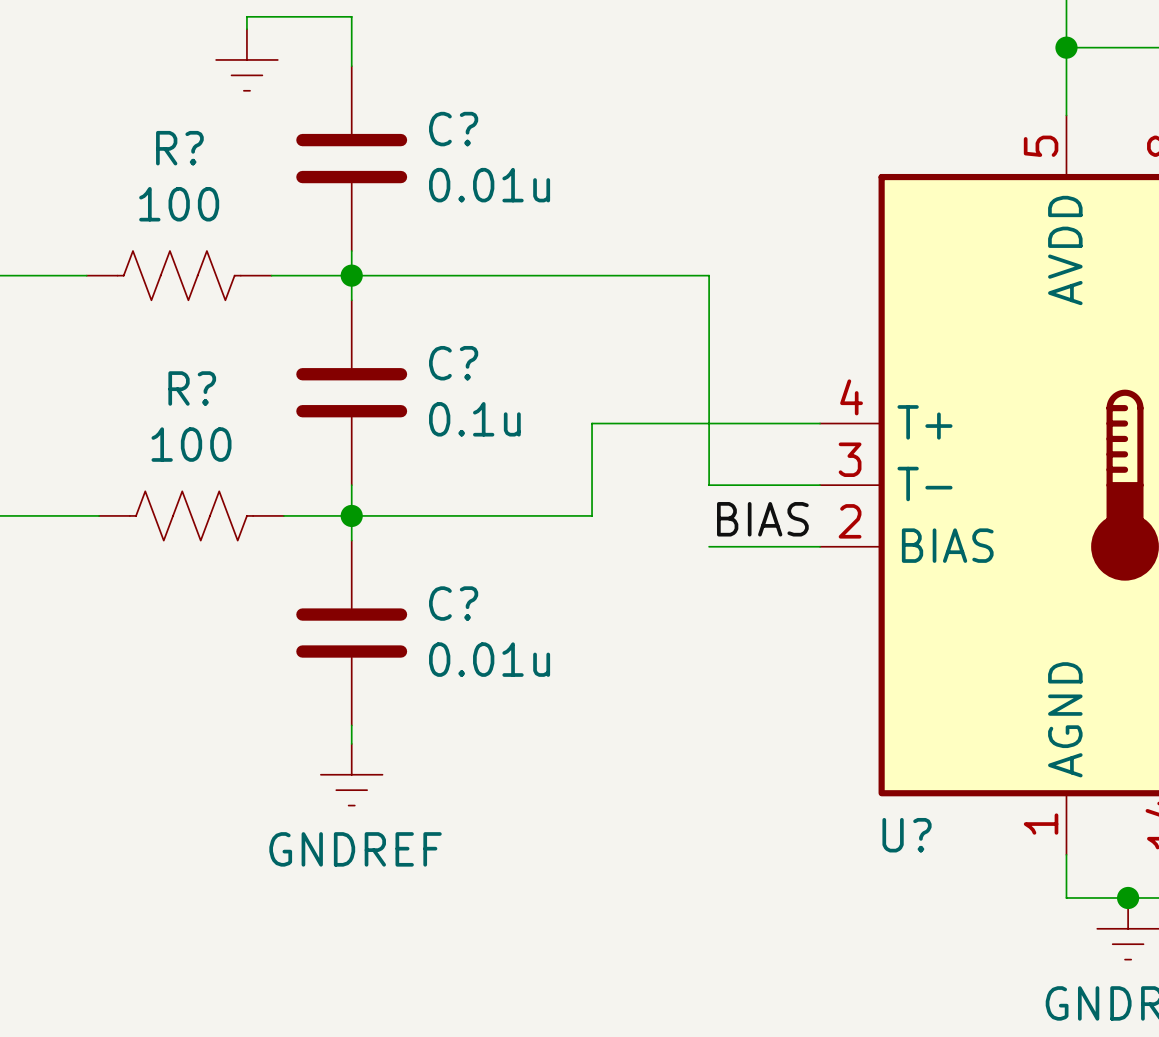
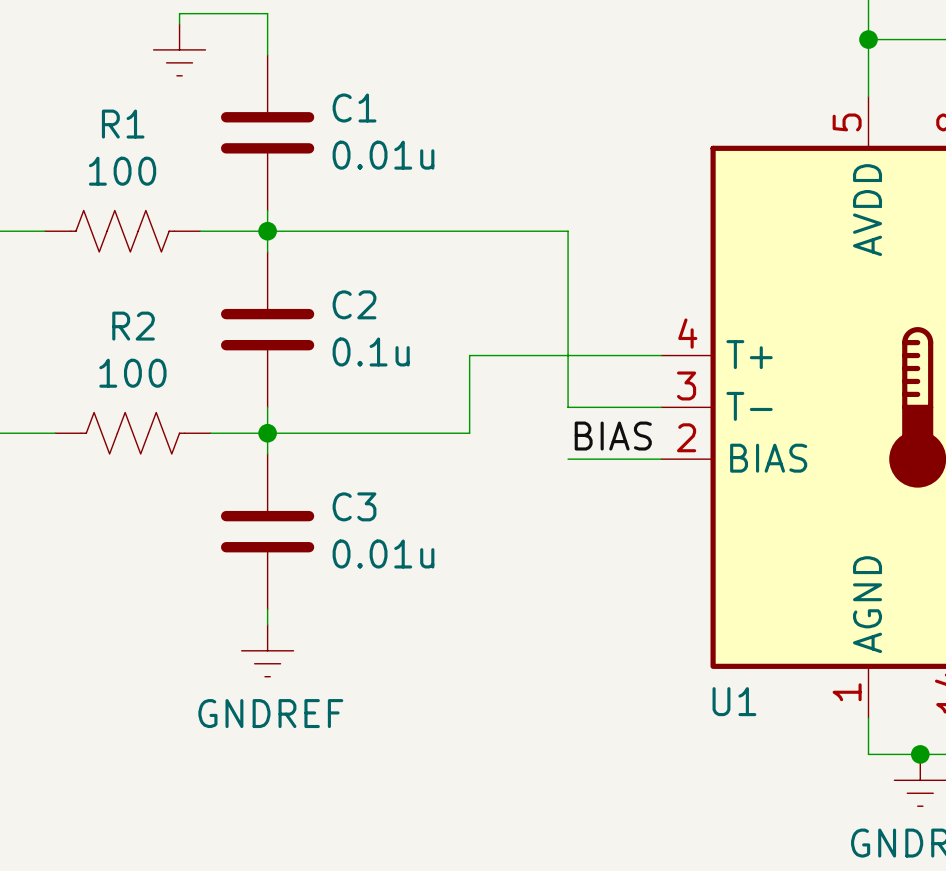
C? name: C? (453, 129) -> C1 (354, 108)
R? name: R? (179, 148) -> R1 (123, 124)
C? name: C? (453, 363) -> C2 (354, 304)
R? name: R? (192, 388) -> R2 (133, 326)
C? name: C? (453, 603) -> C3 (354, 506)
U? name: U? (907, 835) -> U1 (734, 701)

